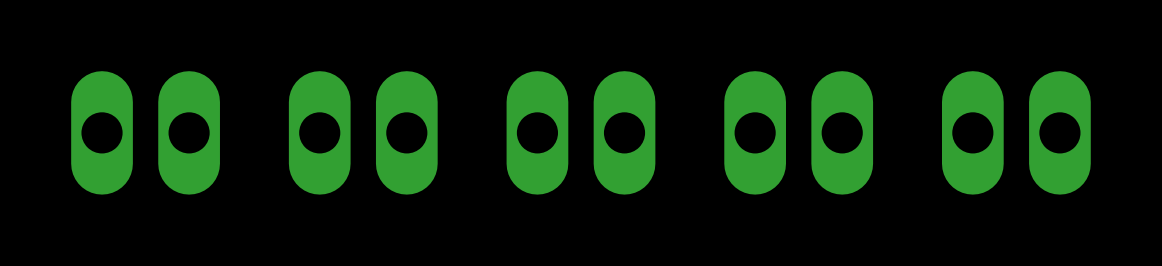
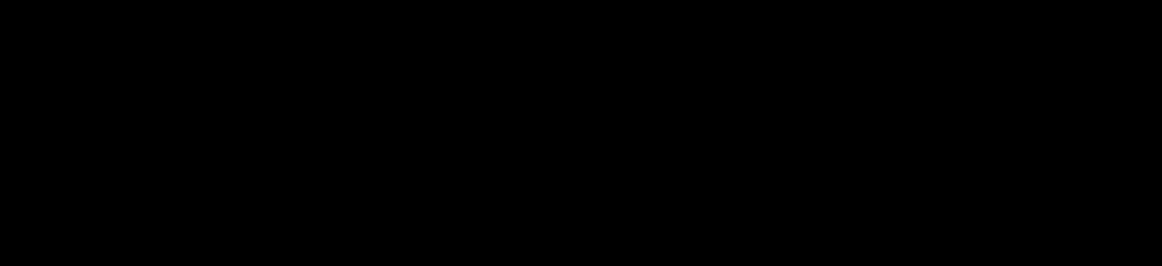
part: (145, 132) -> none
part: (363, 132) -> none
part: (580, 132) -> none
part: (798, 132) -> none
part: (1016, 132) -> none

